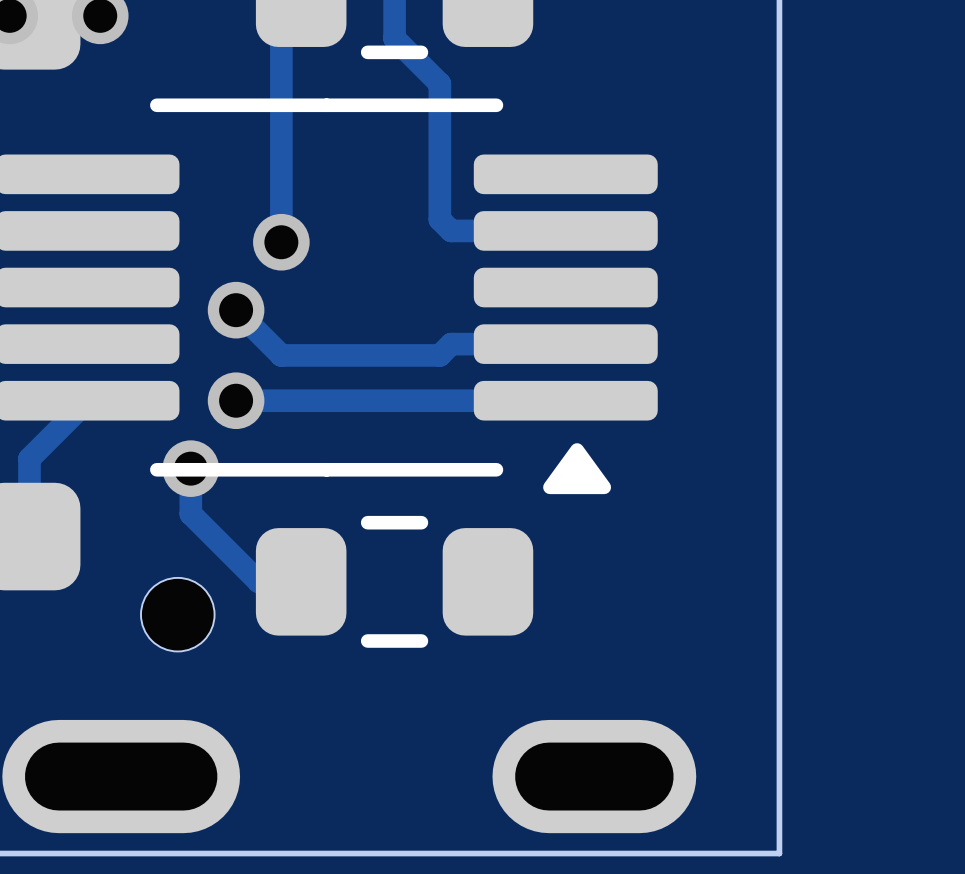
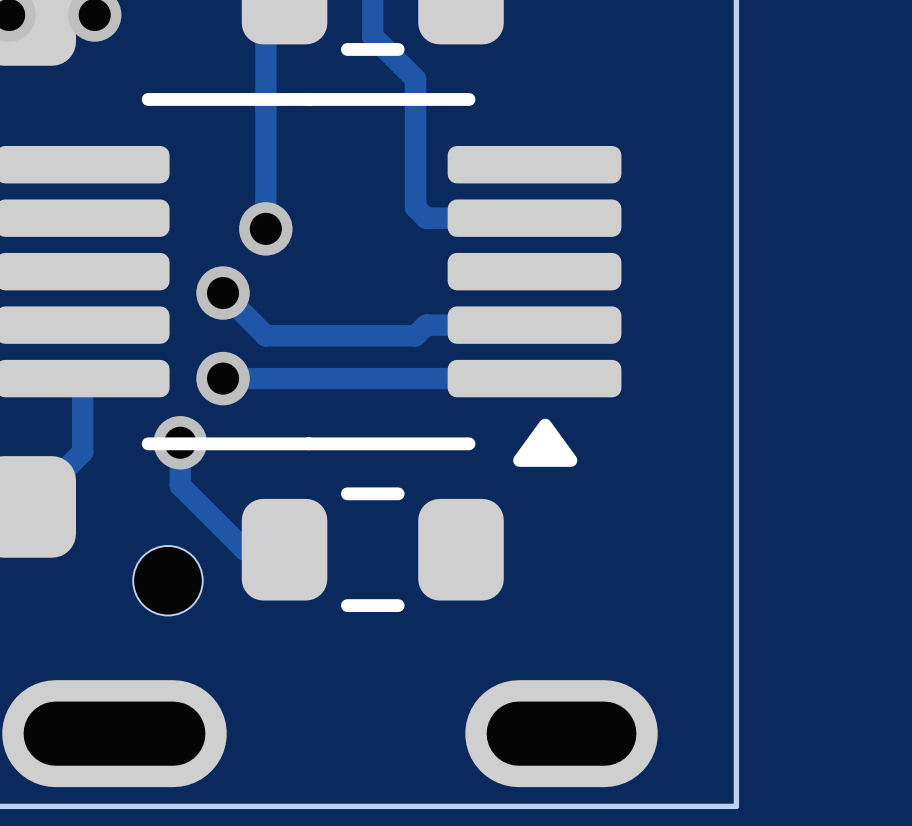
track: (87, 400) (29, 458) (29, 536) -> (82, 378) (82, 452) (27, 506)

